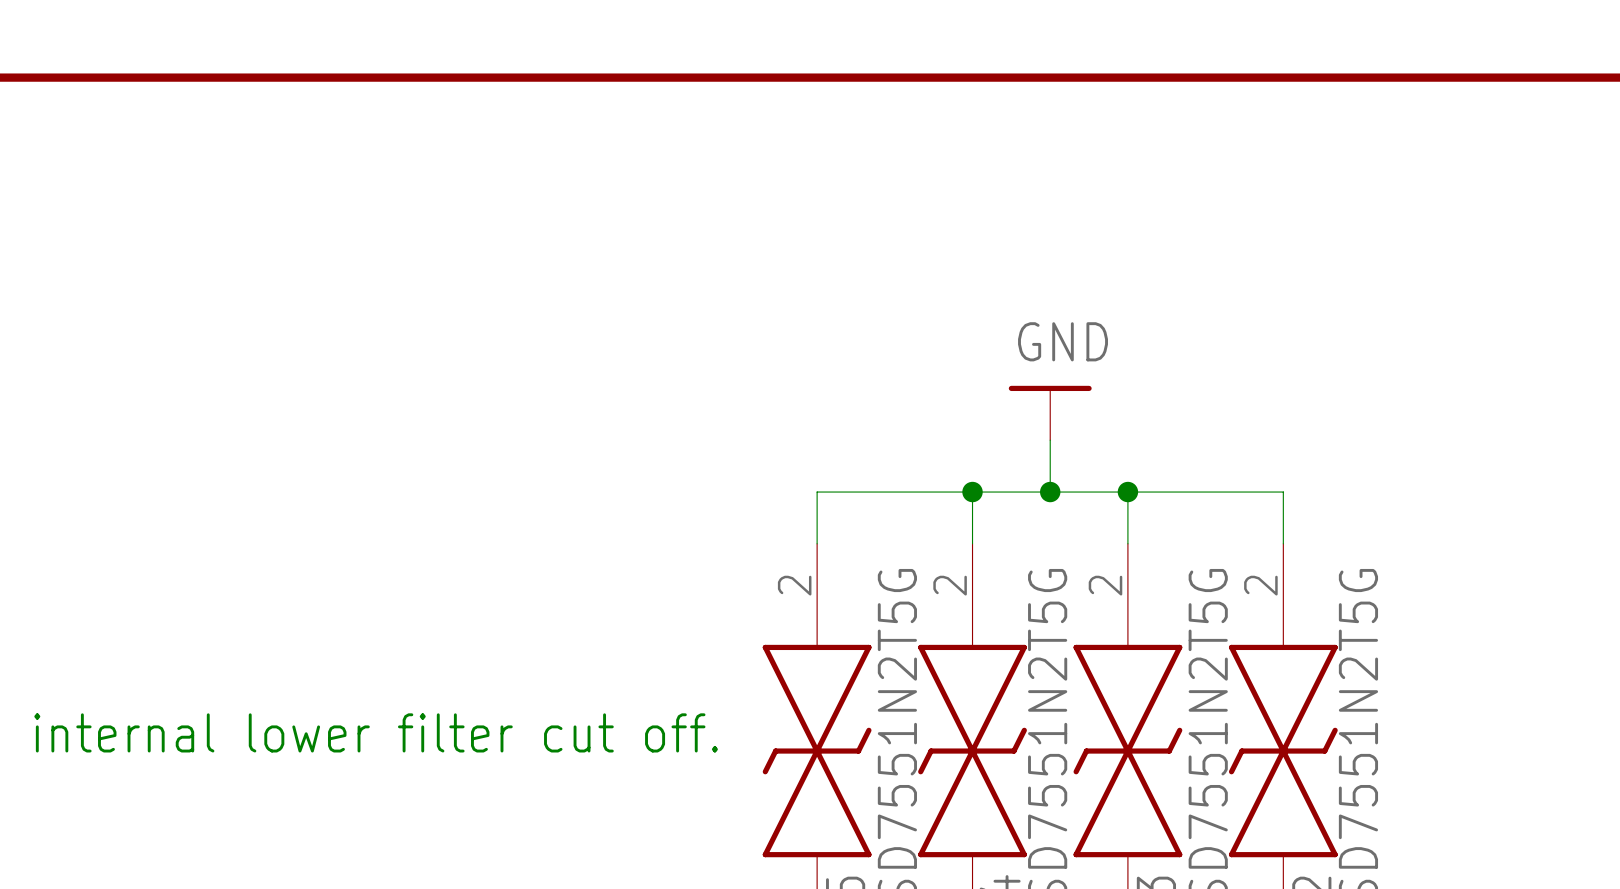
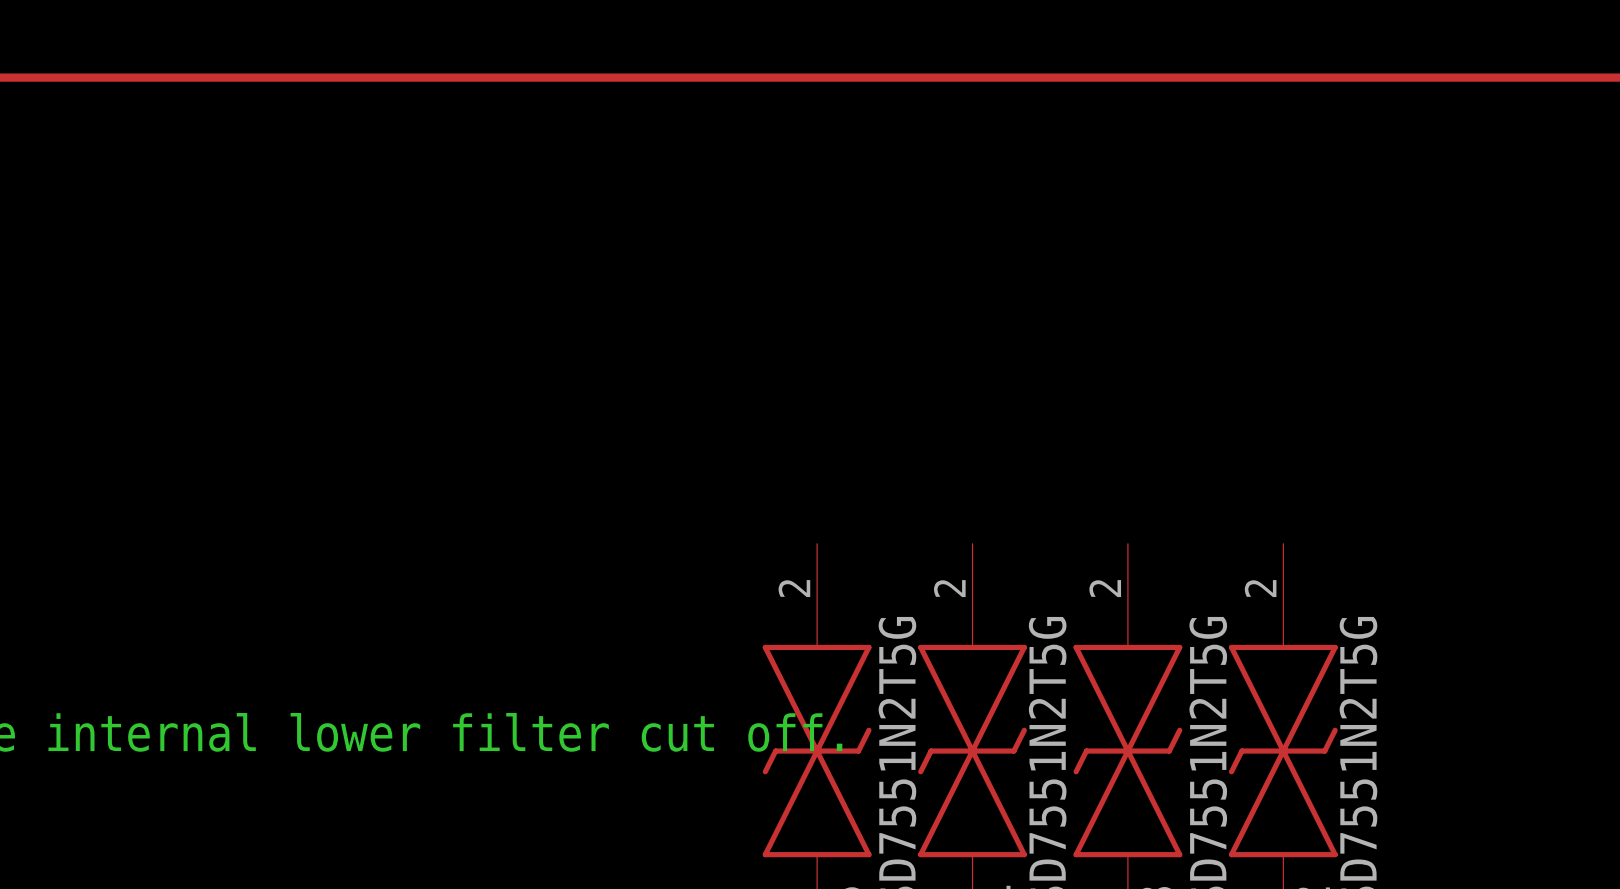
power symbol: GND (1050, 413) -> none
wire: (1050, 440) (1050, 492) -> none
wire: (972, 492) (972, 543) -> none
junction: (972, 492) -> none
junction: (1050, 492) -> none
wire: (1127, 492) (1127, 543) -> none
junction: (1127, 492) -> none
wire: (817, 543) (817, 492) (1283, 492) (1283, 543) -> none

